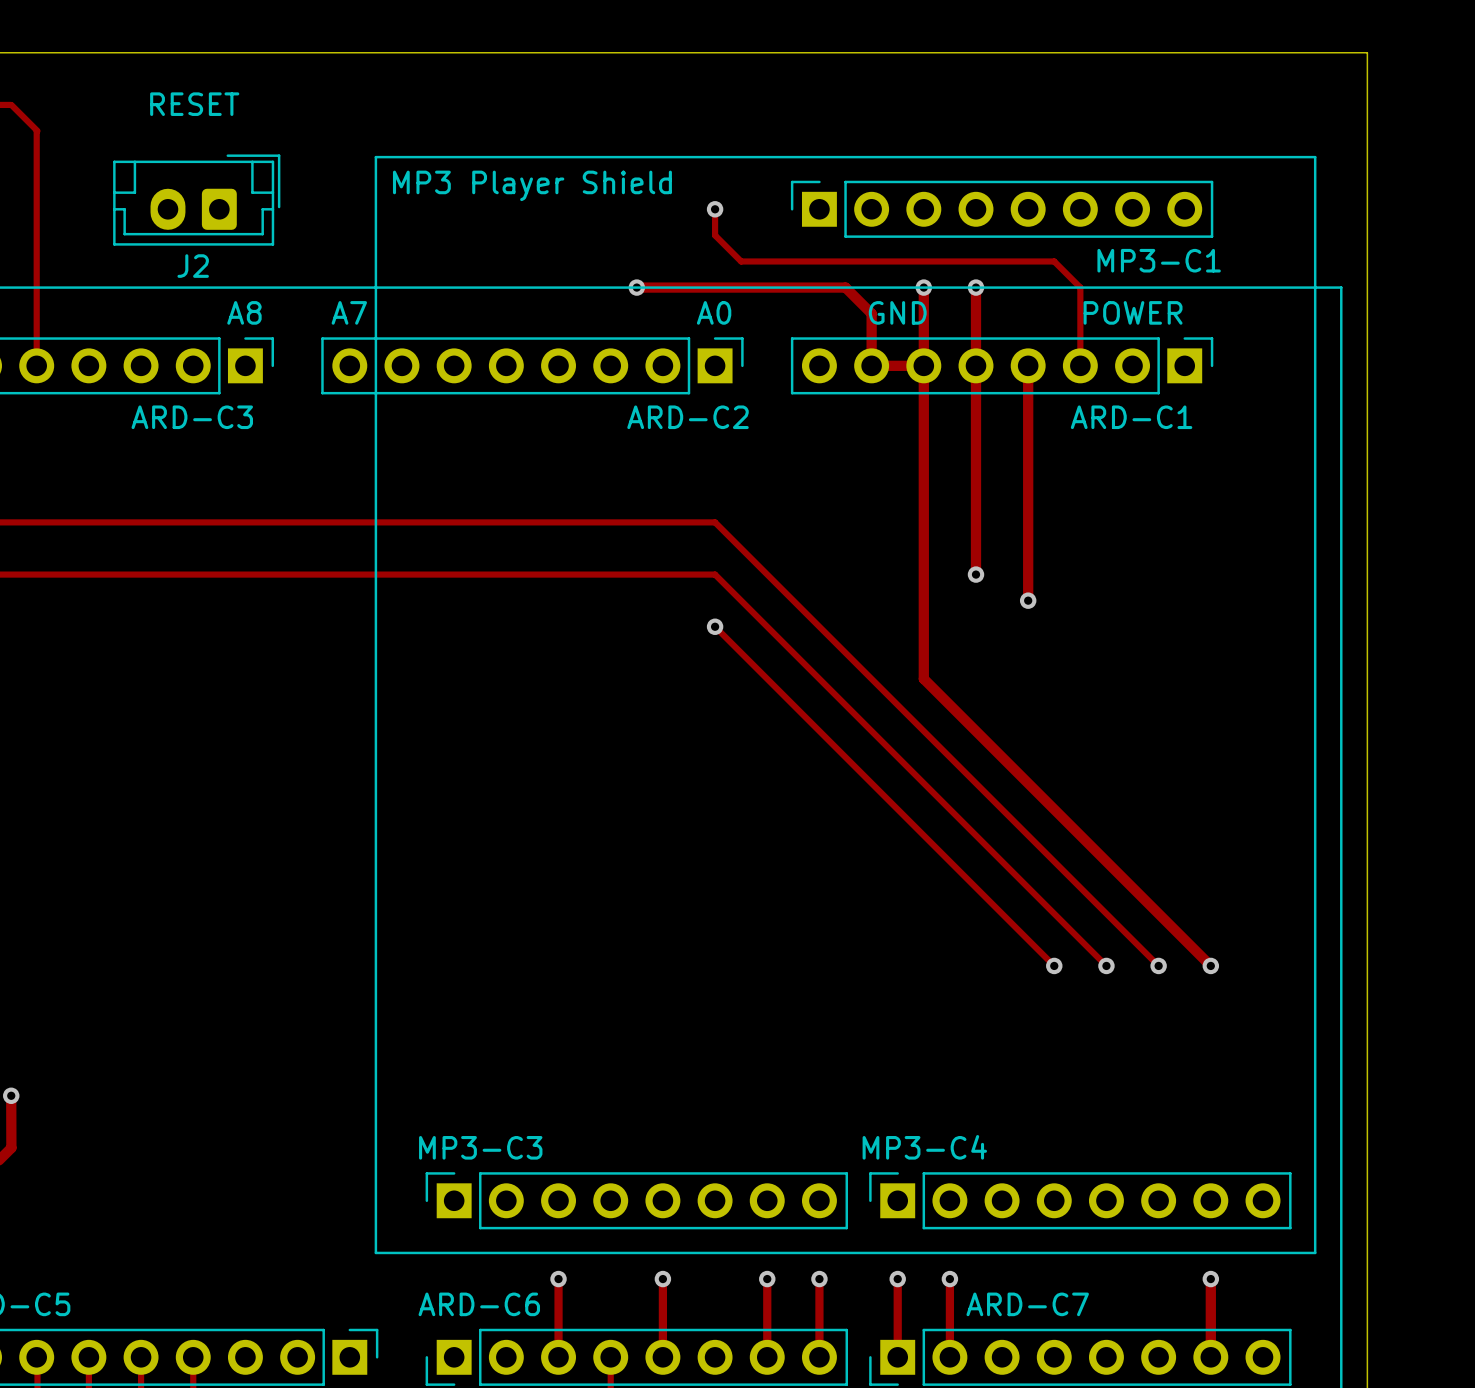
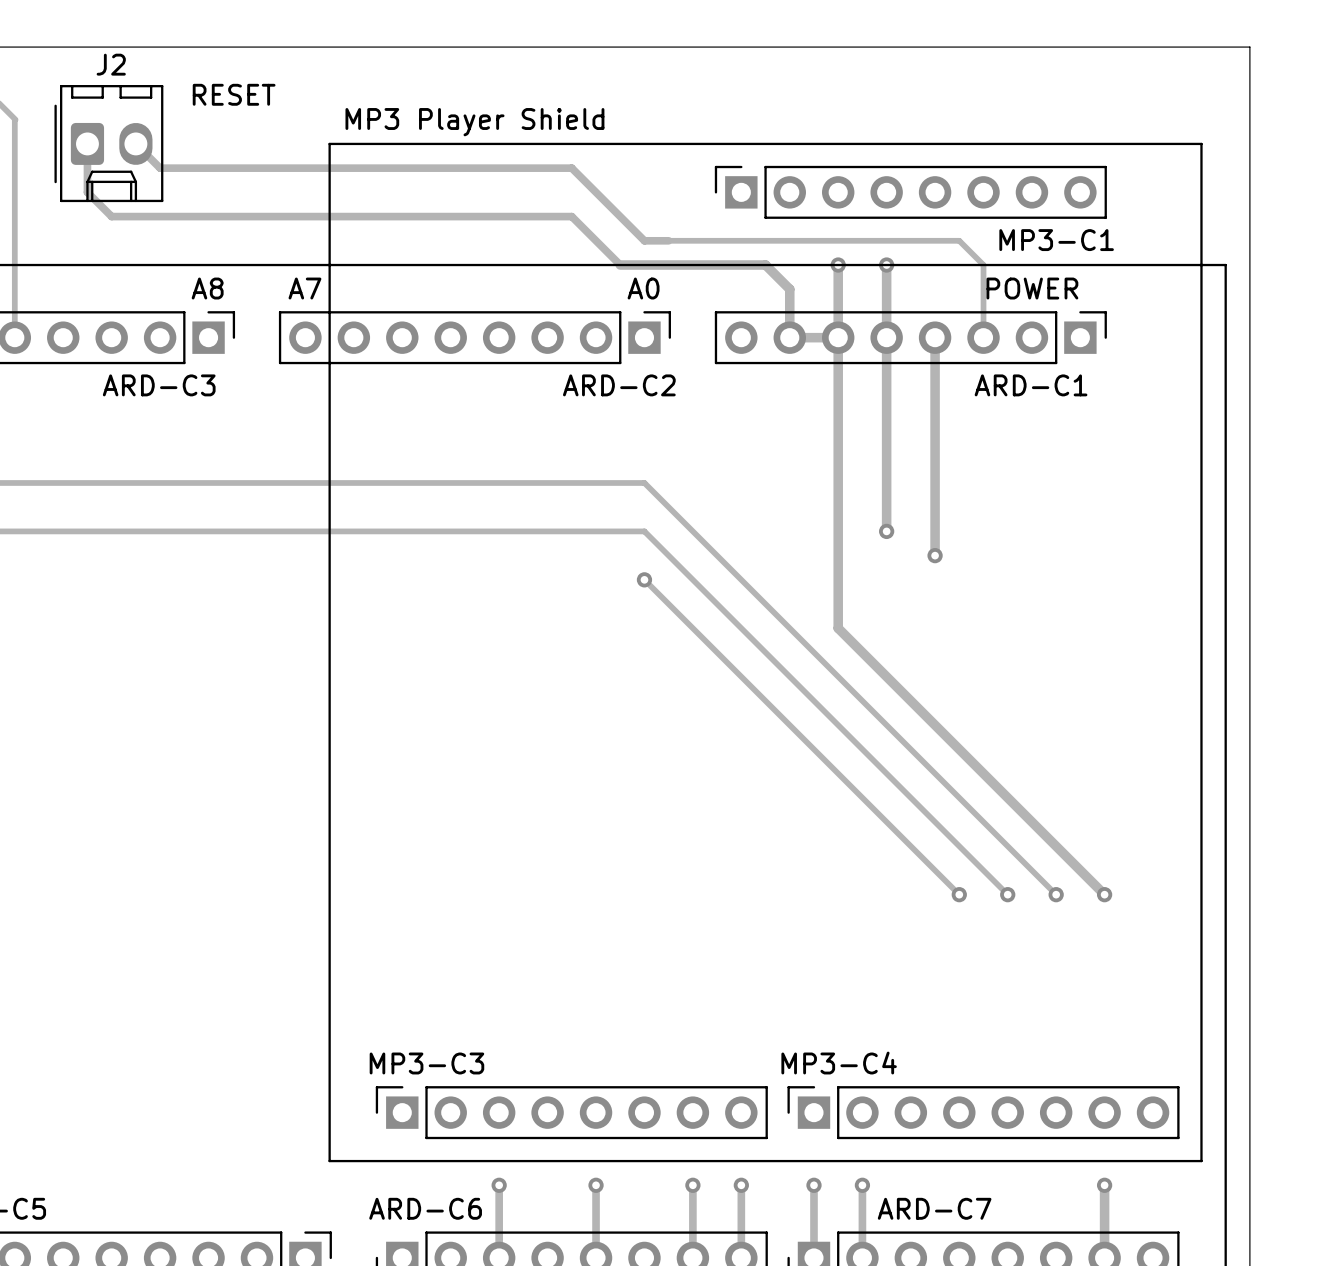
text position: RESET (194, 104) -> RESET (234, 94)
J2 footprint: [113, 154, 281, 246] -> [54, 85, 164, 203]
text position: MP3 Player Shield (532, 185) -> MP3 Player Shield (474, 122)
track: (715, 209) (715, 235) (741, 261) -> (135, 143) (160, 168) (571, 168) (644, 240) (668, 240)
via: (715, 209) -> none
J2 name position: J2 (193, 266) -> J2 (111, 64)
track: (636, 287) (688, 287) -> (87, 143) (87, 192) (111, 216) (571, 216) (620, 265)
via: (636, 287) -> none
text: GND (897, 312) -> none

